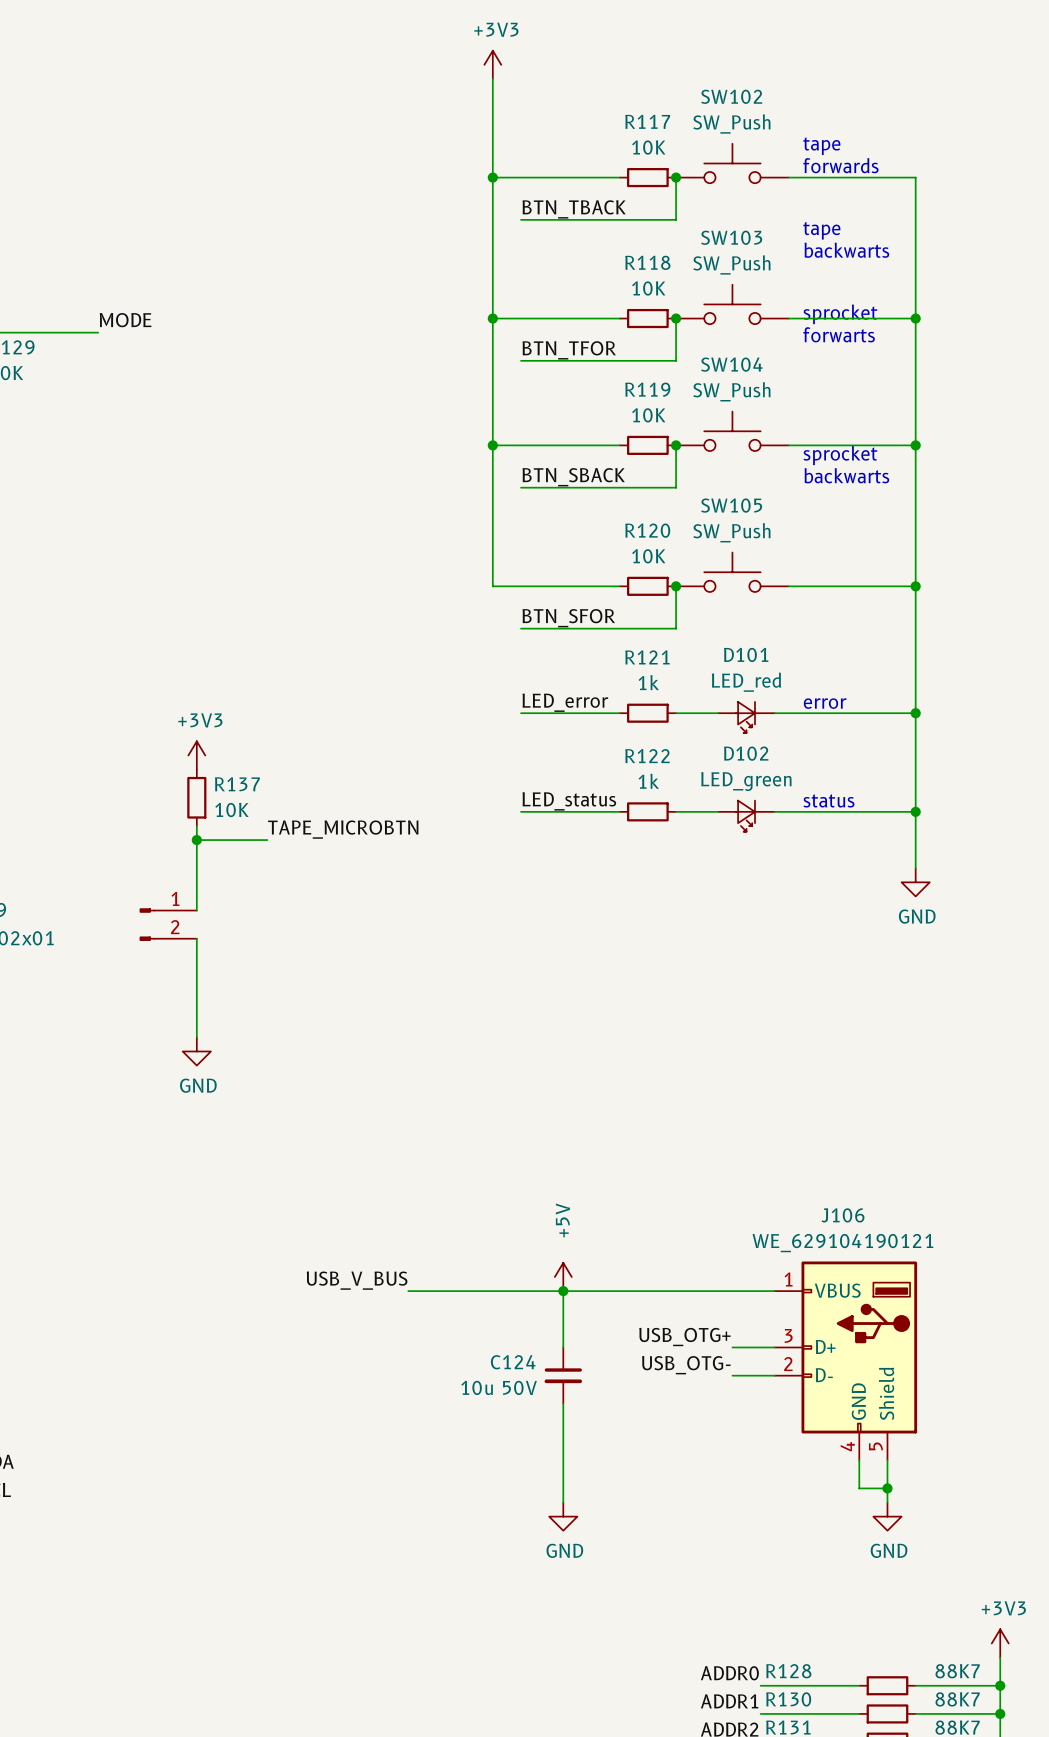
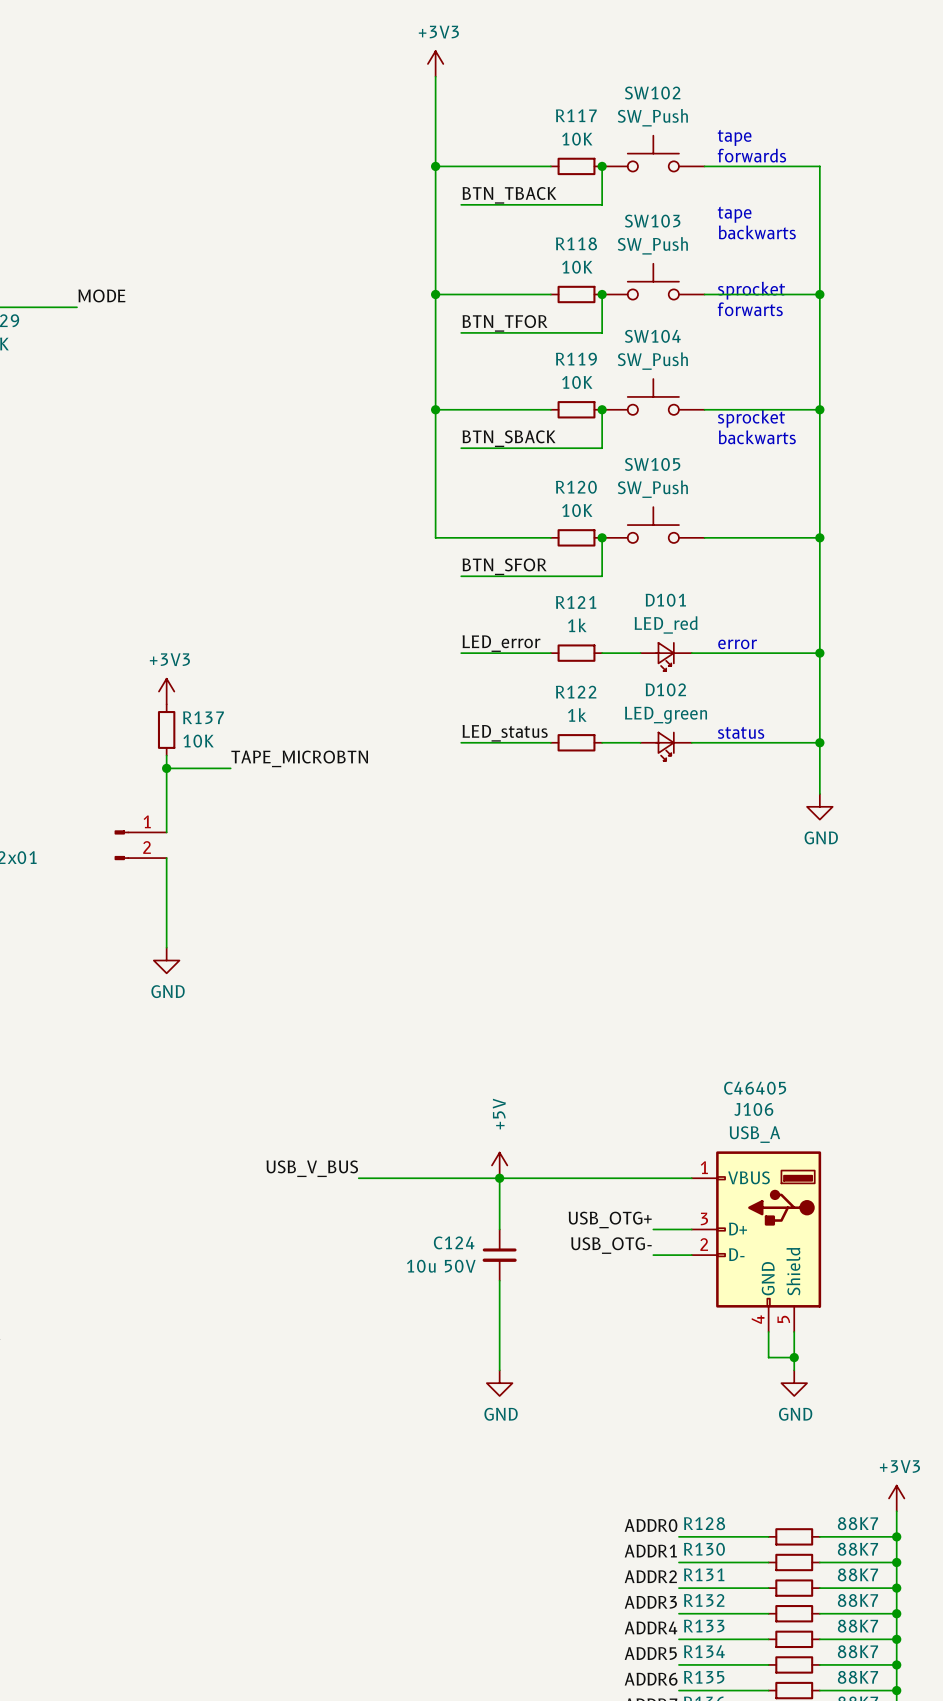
J106 text: none -> C46405 (755, 1088)
J106 value: WE_629104190121 (842, 1243) -> USB_A (754, 1134)

